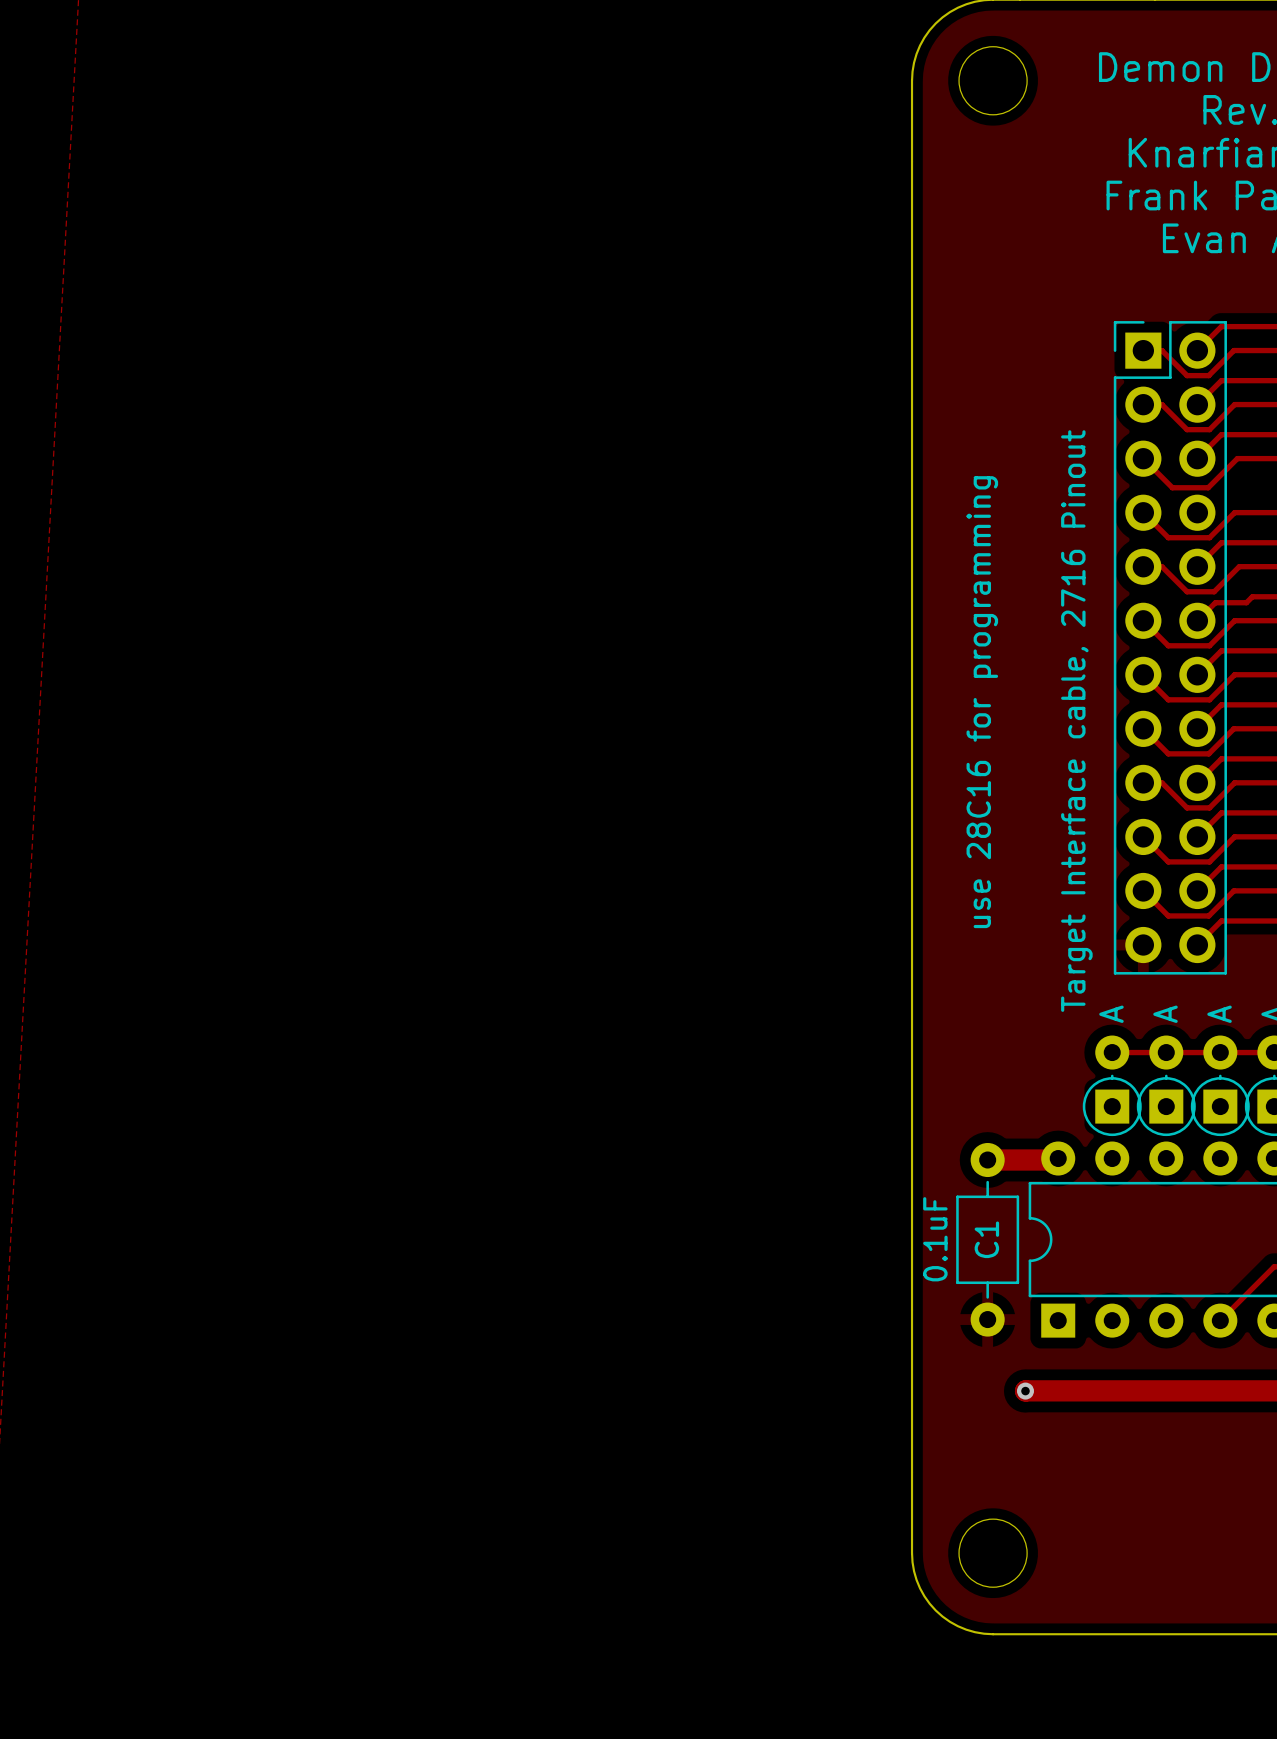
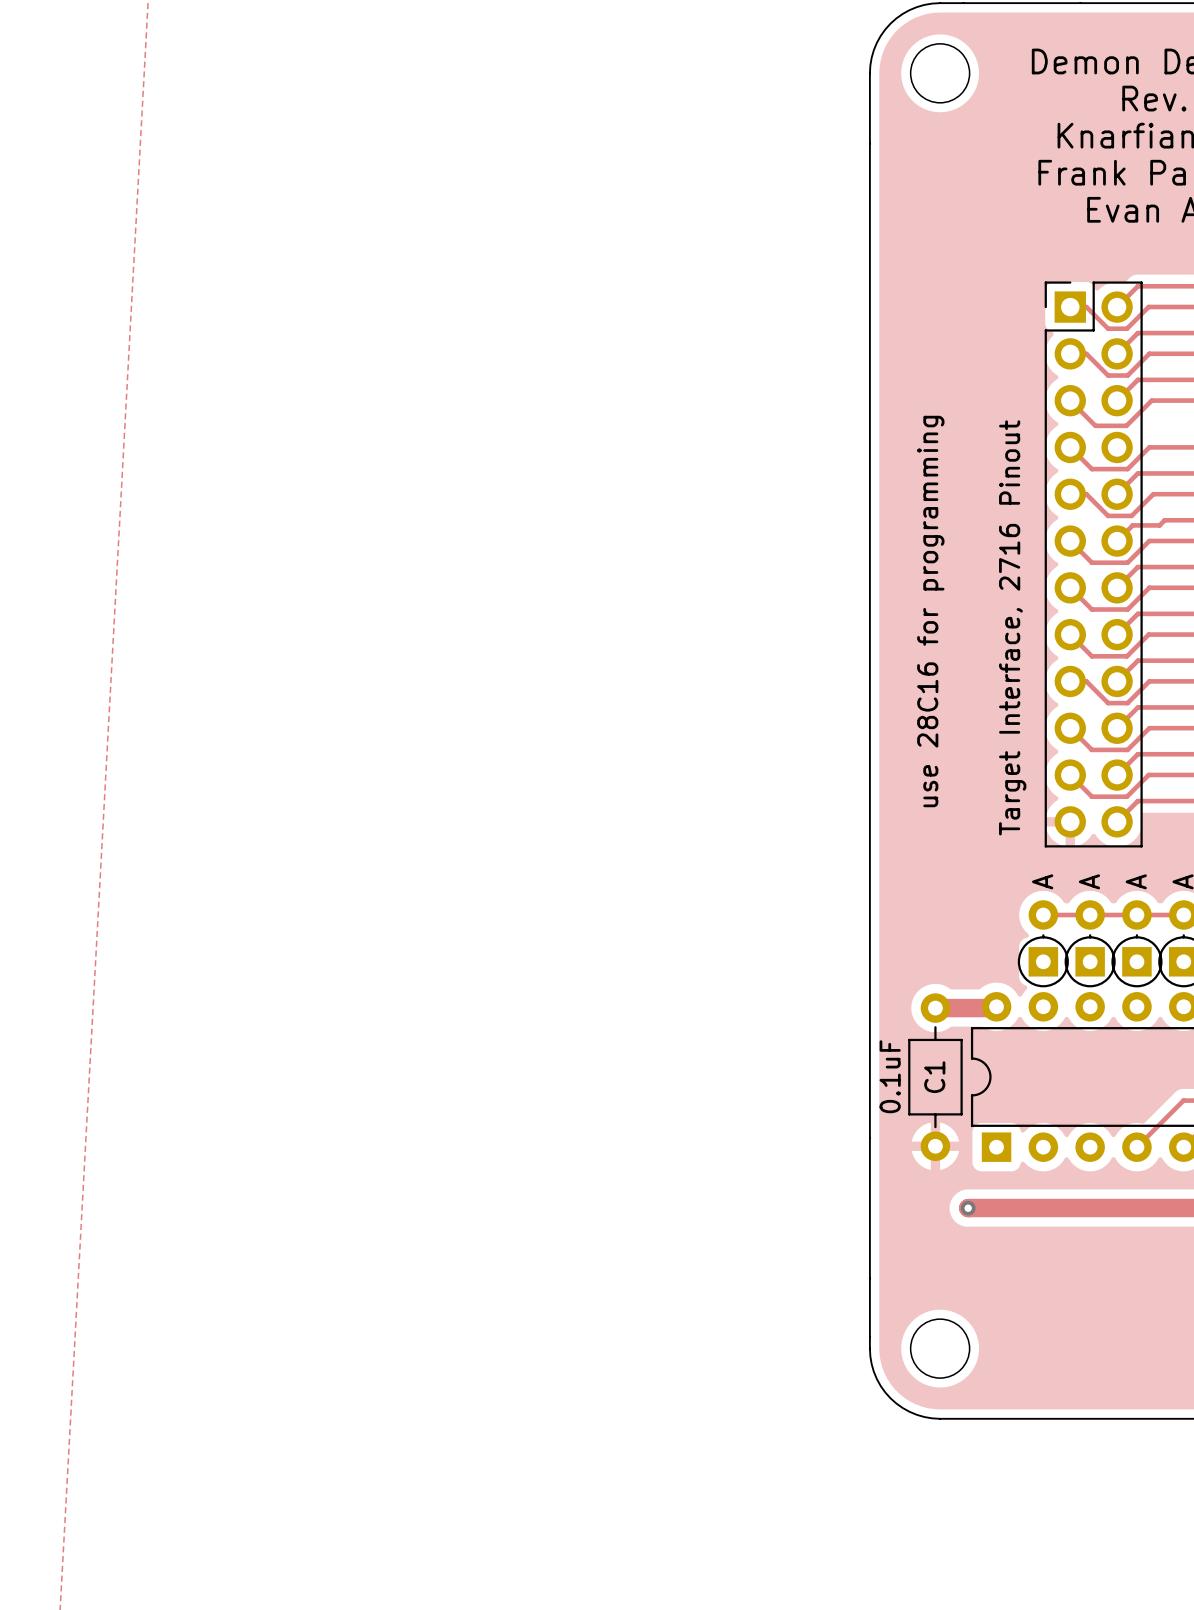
part value: Target Interface cable, 2716 Pinout (1076, 721) -> Target Interface, 2716 Pinout (1012, 627)

